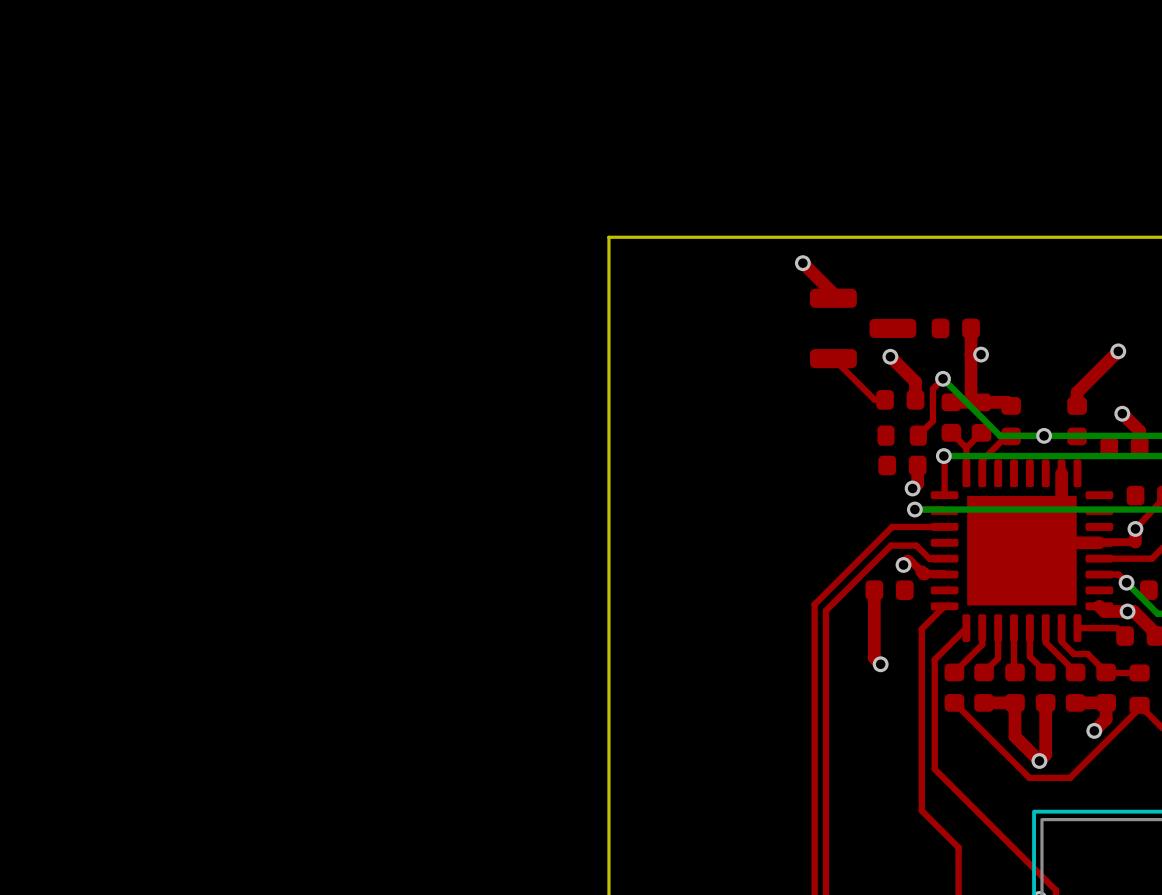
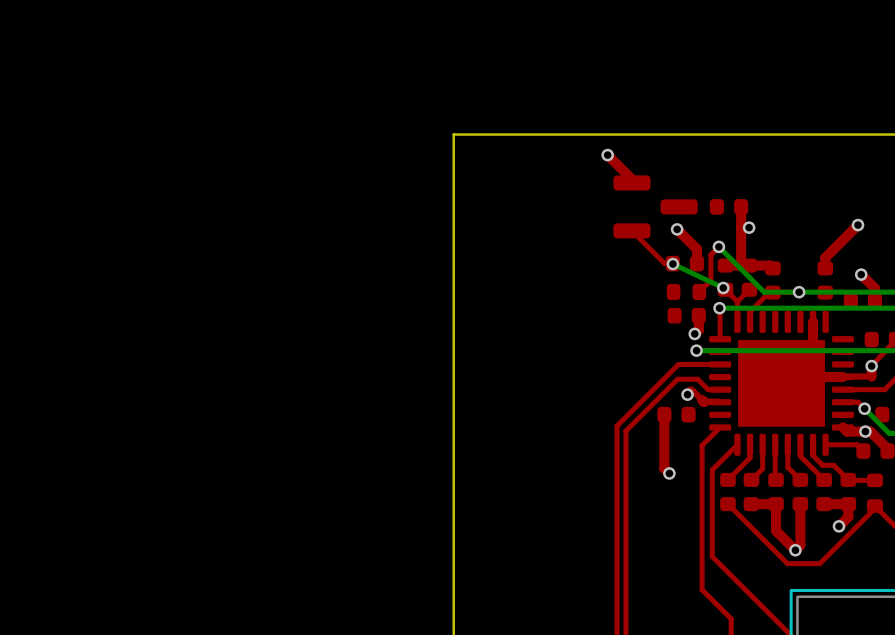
bottom track: none -> (672, 264) (723, 287)
via: none -> (672, 264)
via: none -> (723, 287)

